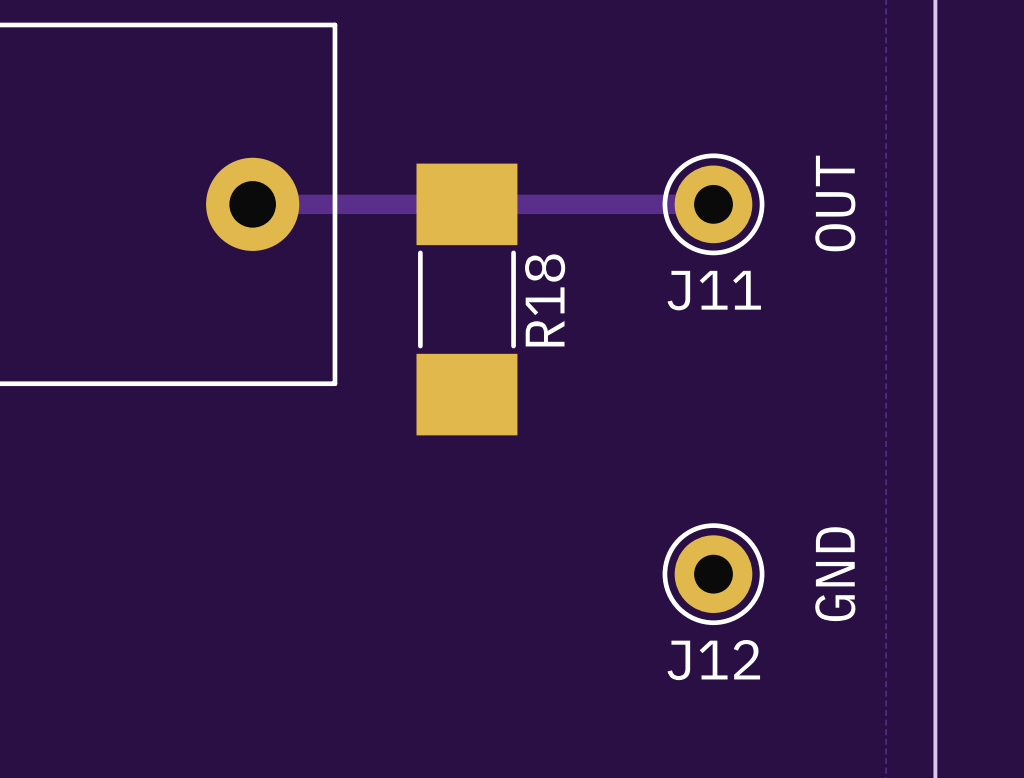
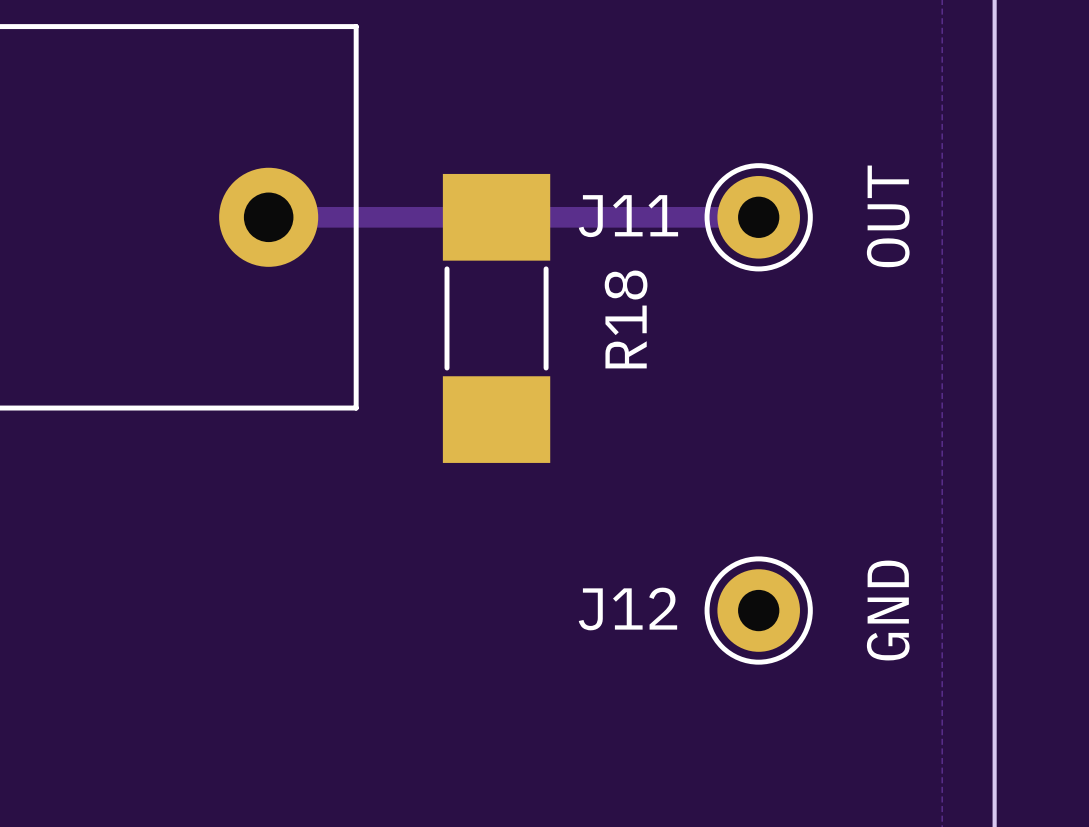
J11 name position: J11 (714, 290) -> J11 (628, 216)
R18 name position: R18 (545, 300) -> R18 (626, 319)
J12 name position: J12 (713, 660) -> J12 (627, 608)

